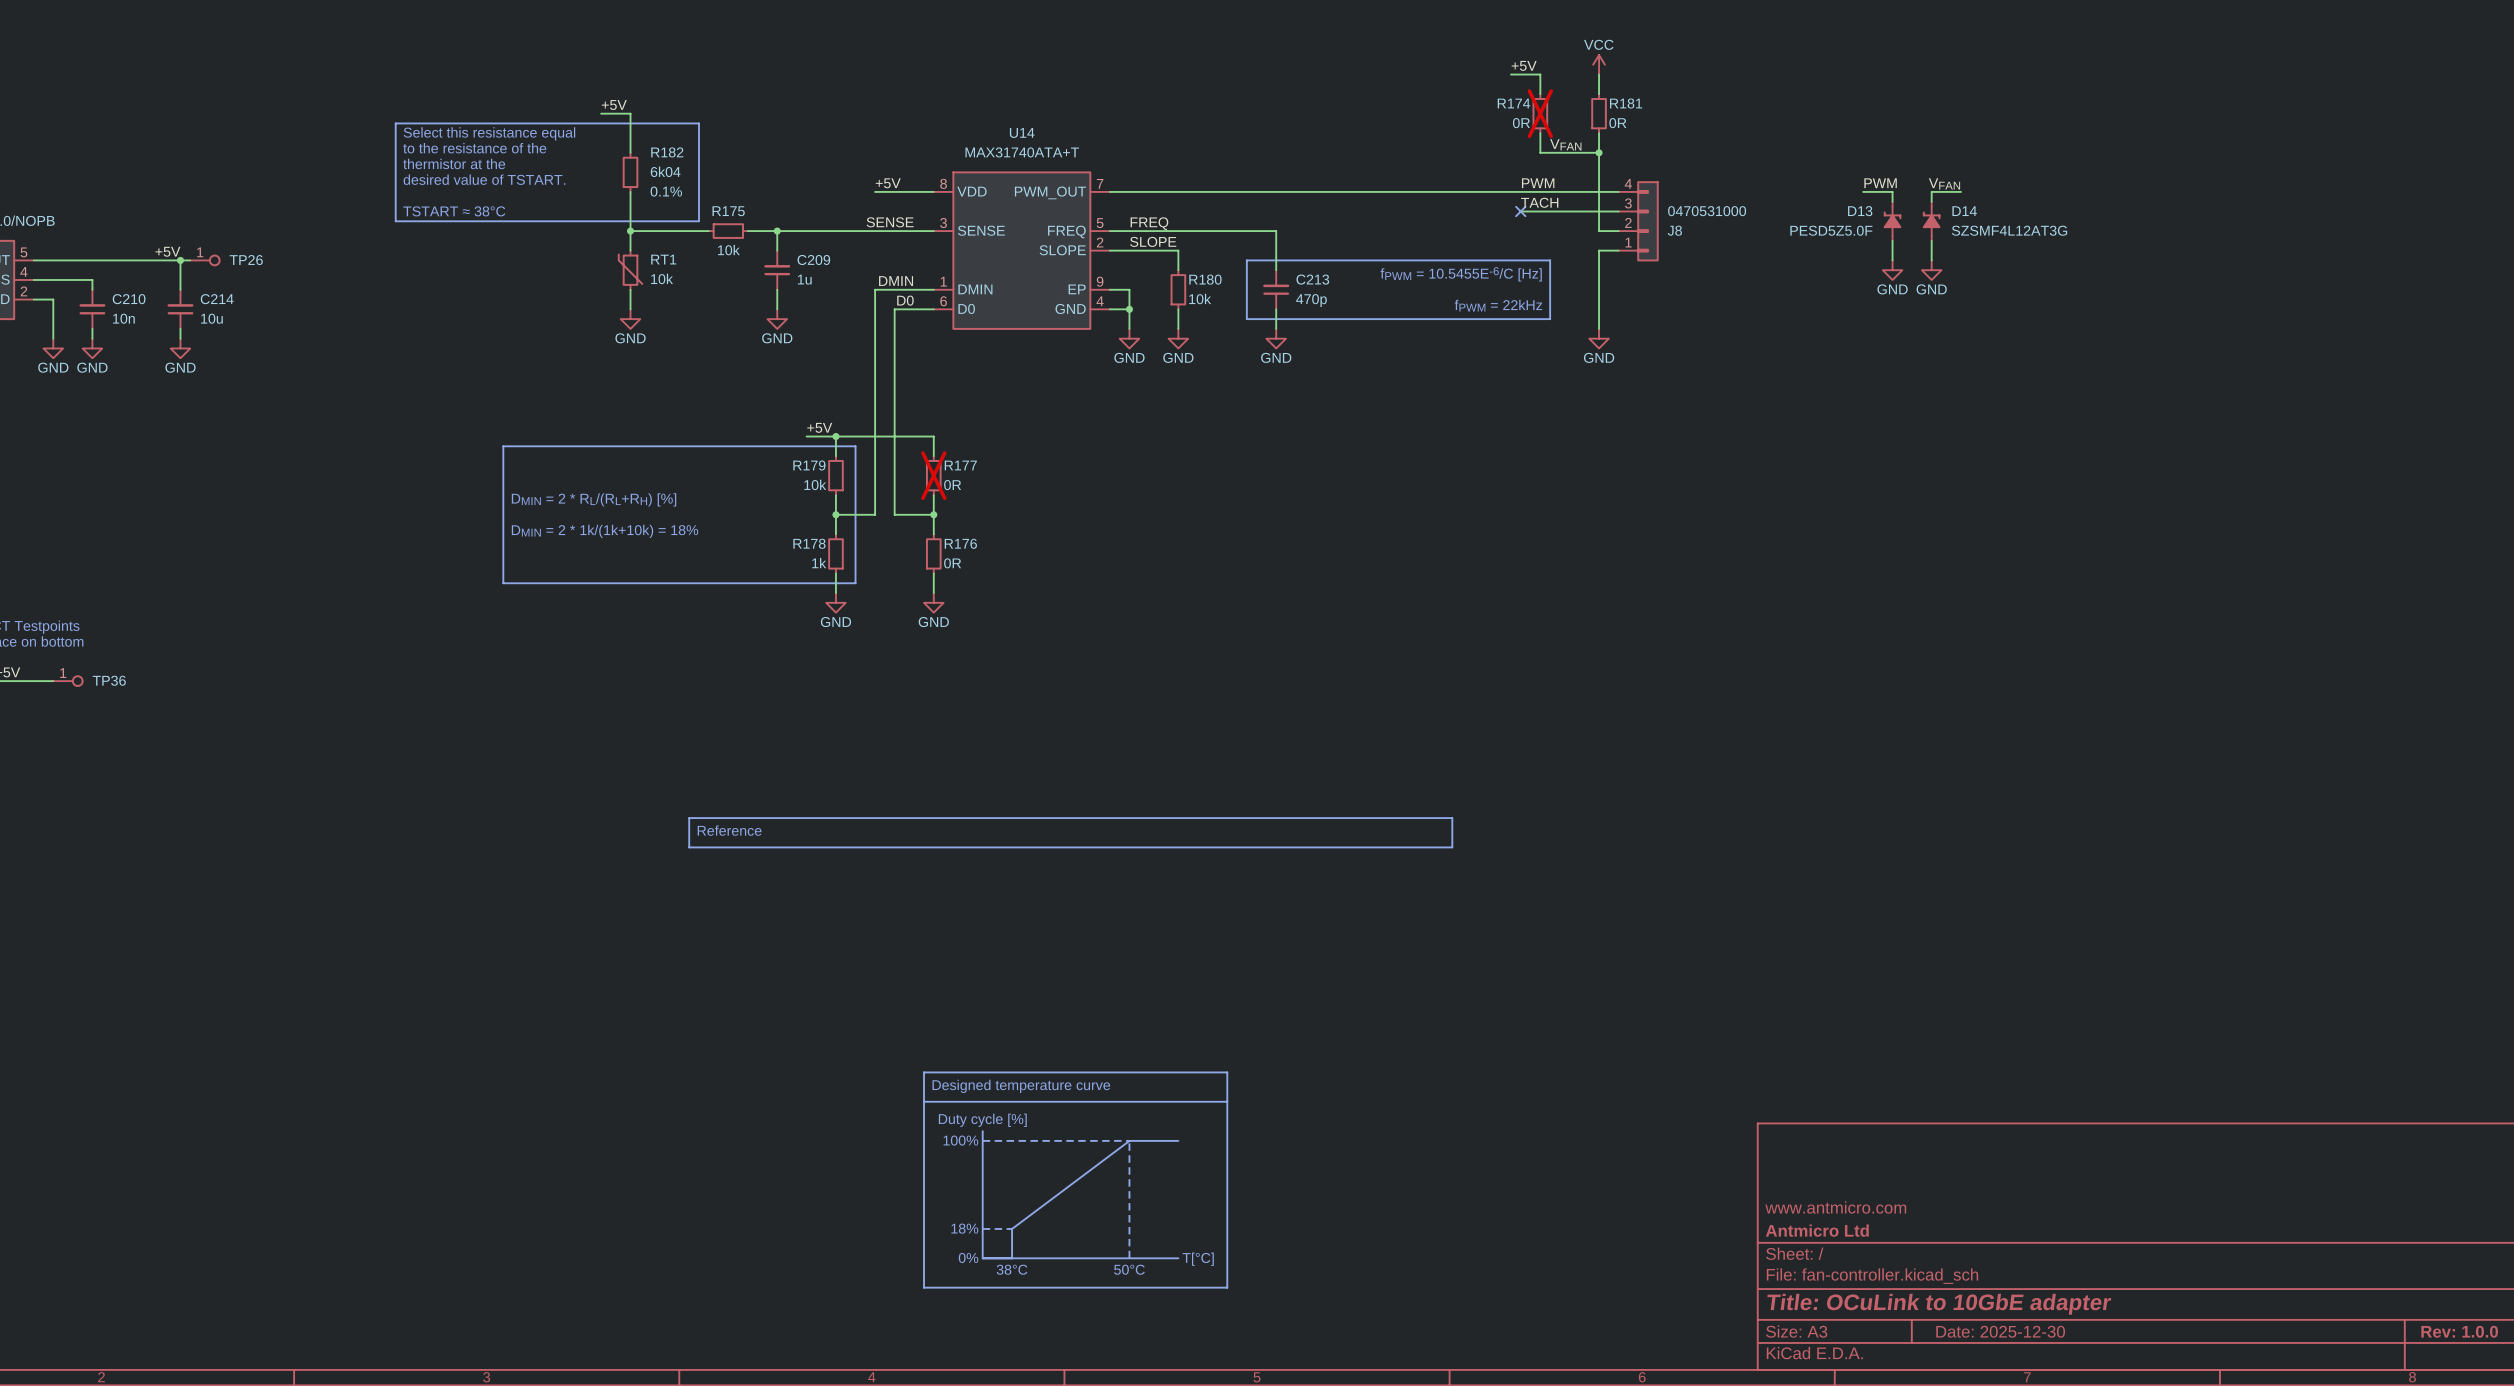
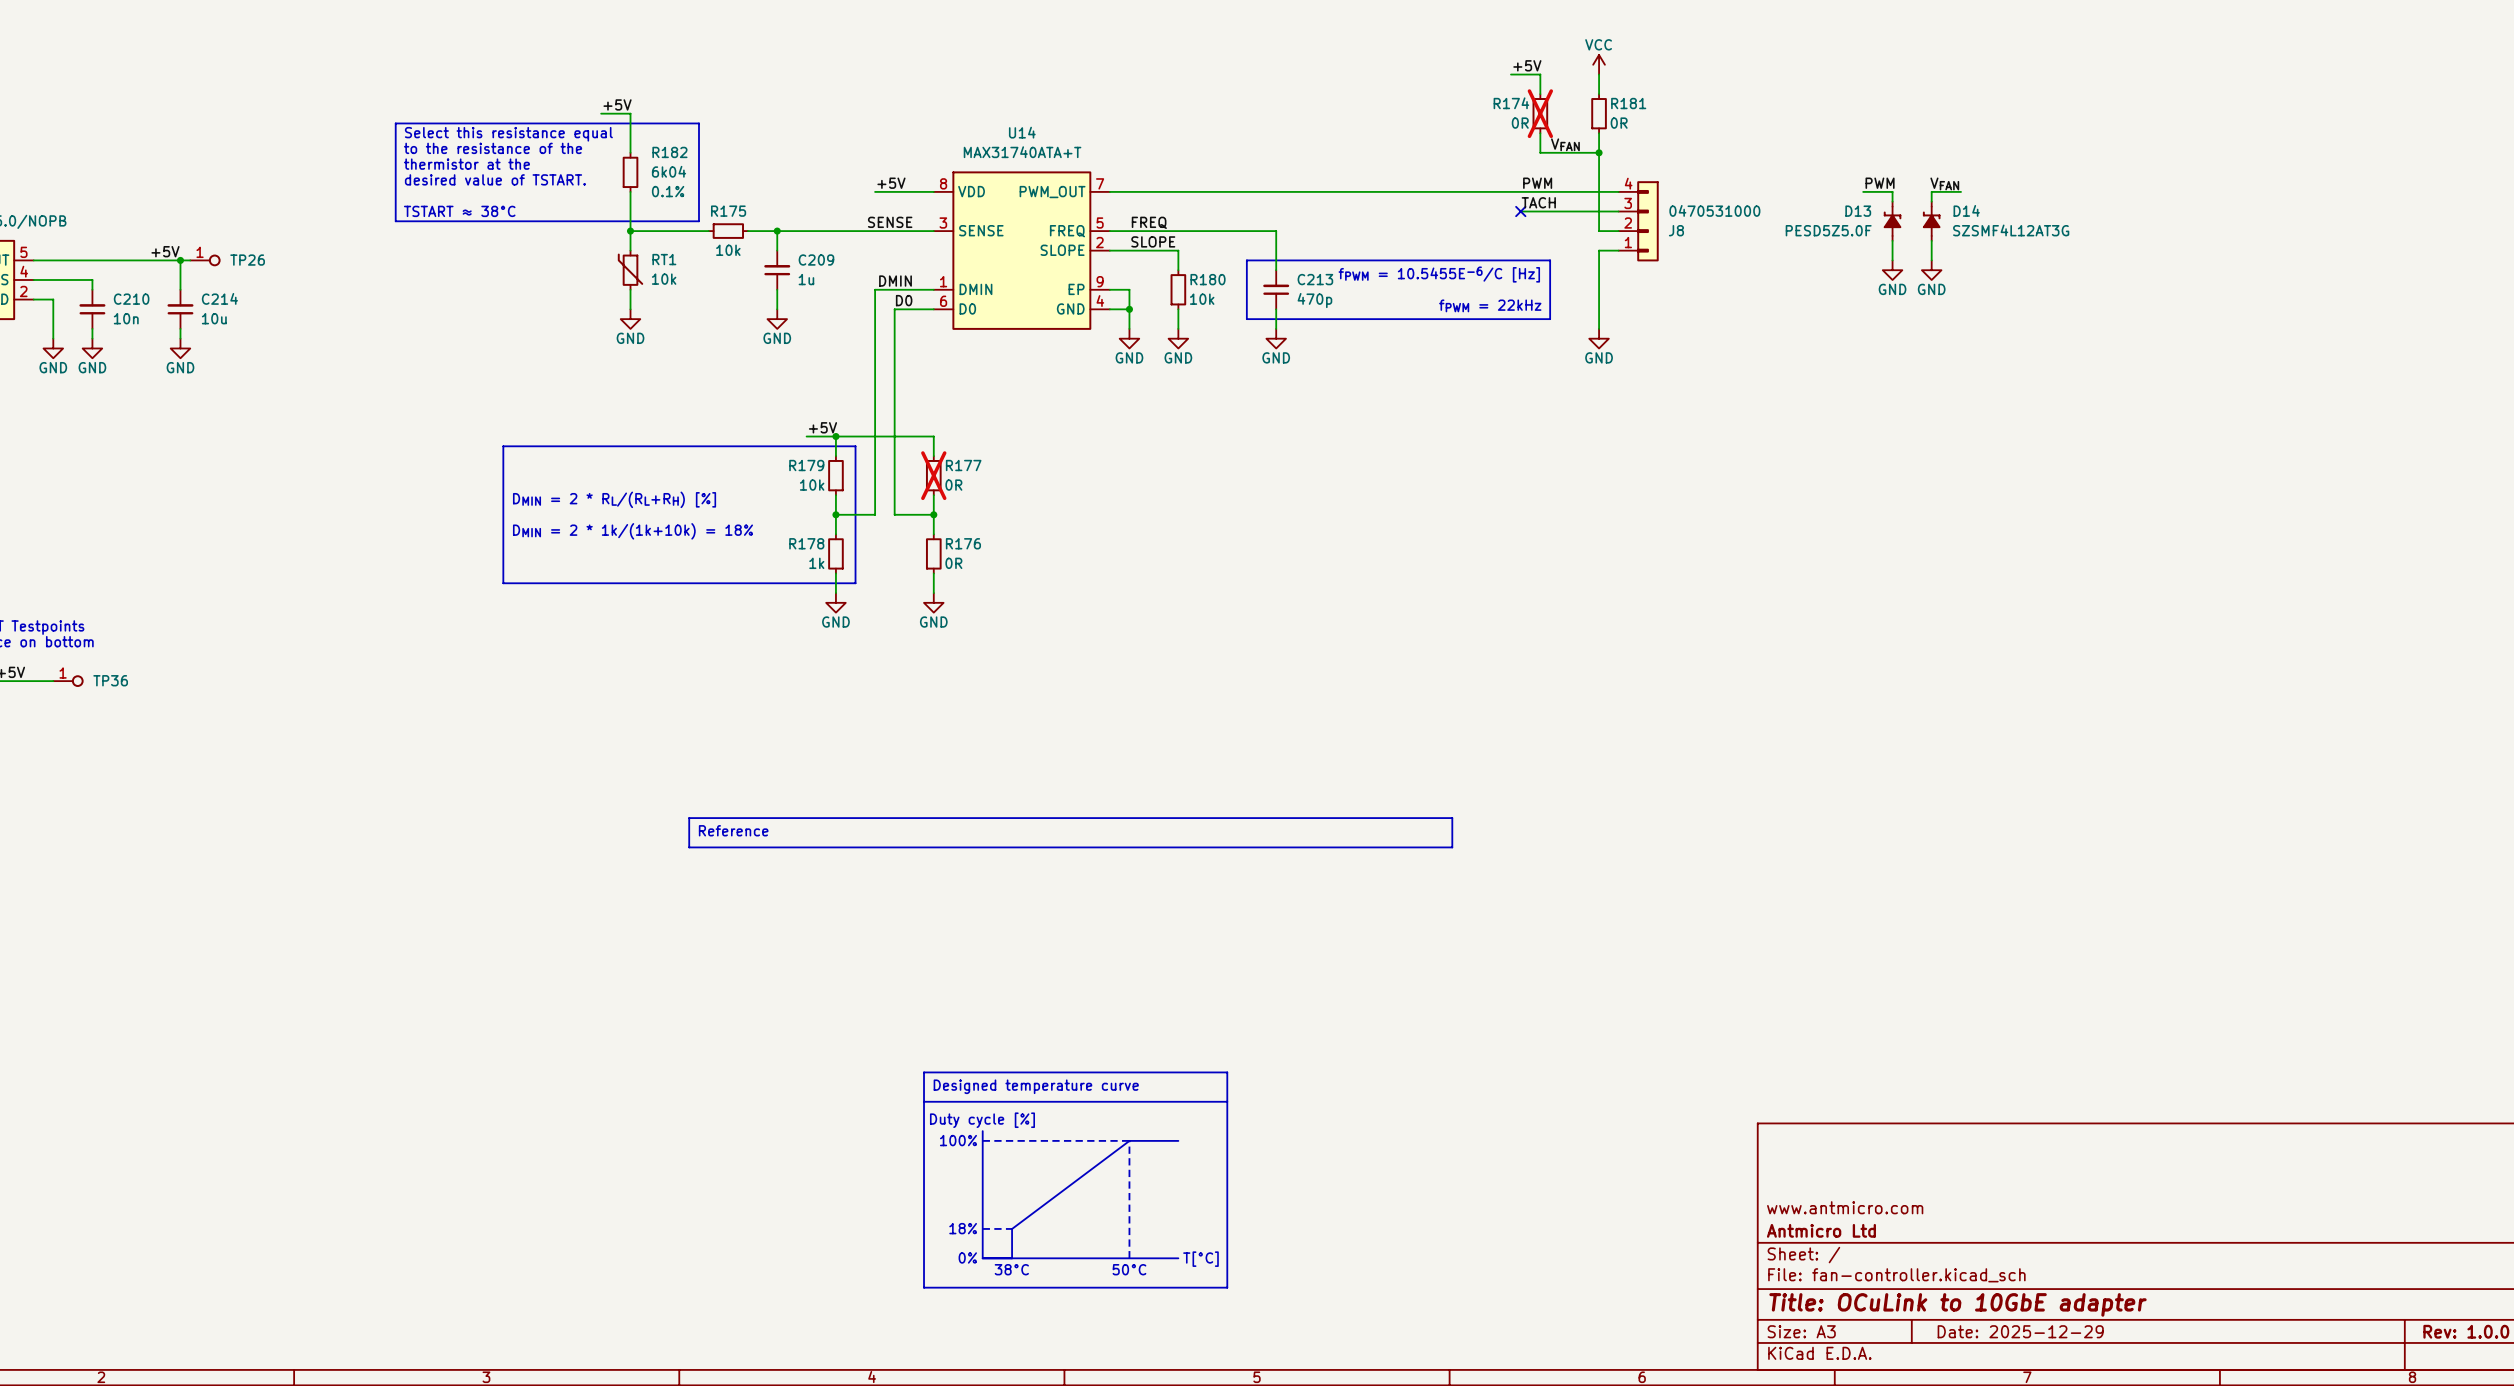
title block: Date: 2025-12-30 (2000, 1331) -> Date: 2025-12-29 (2020, 1331)

